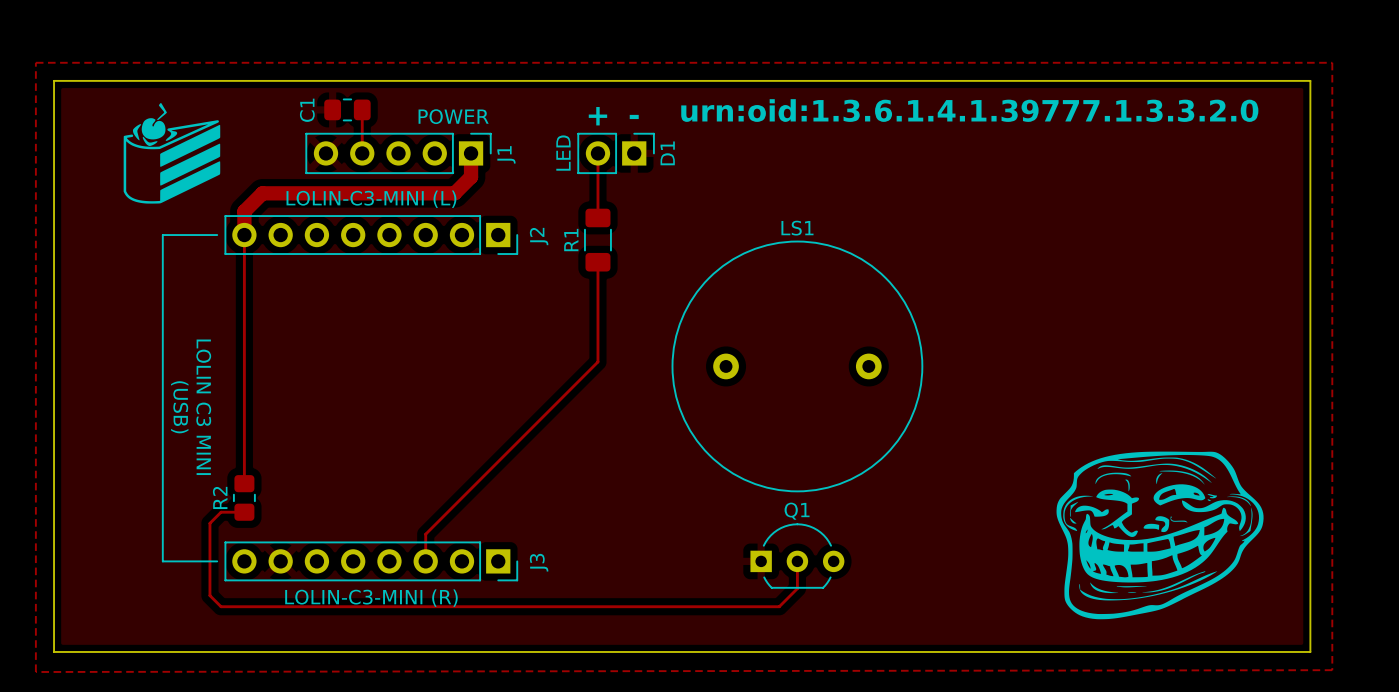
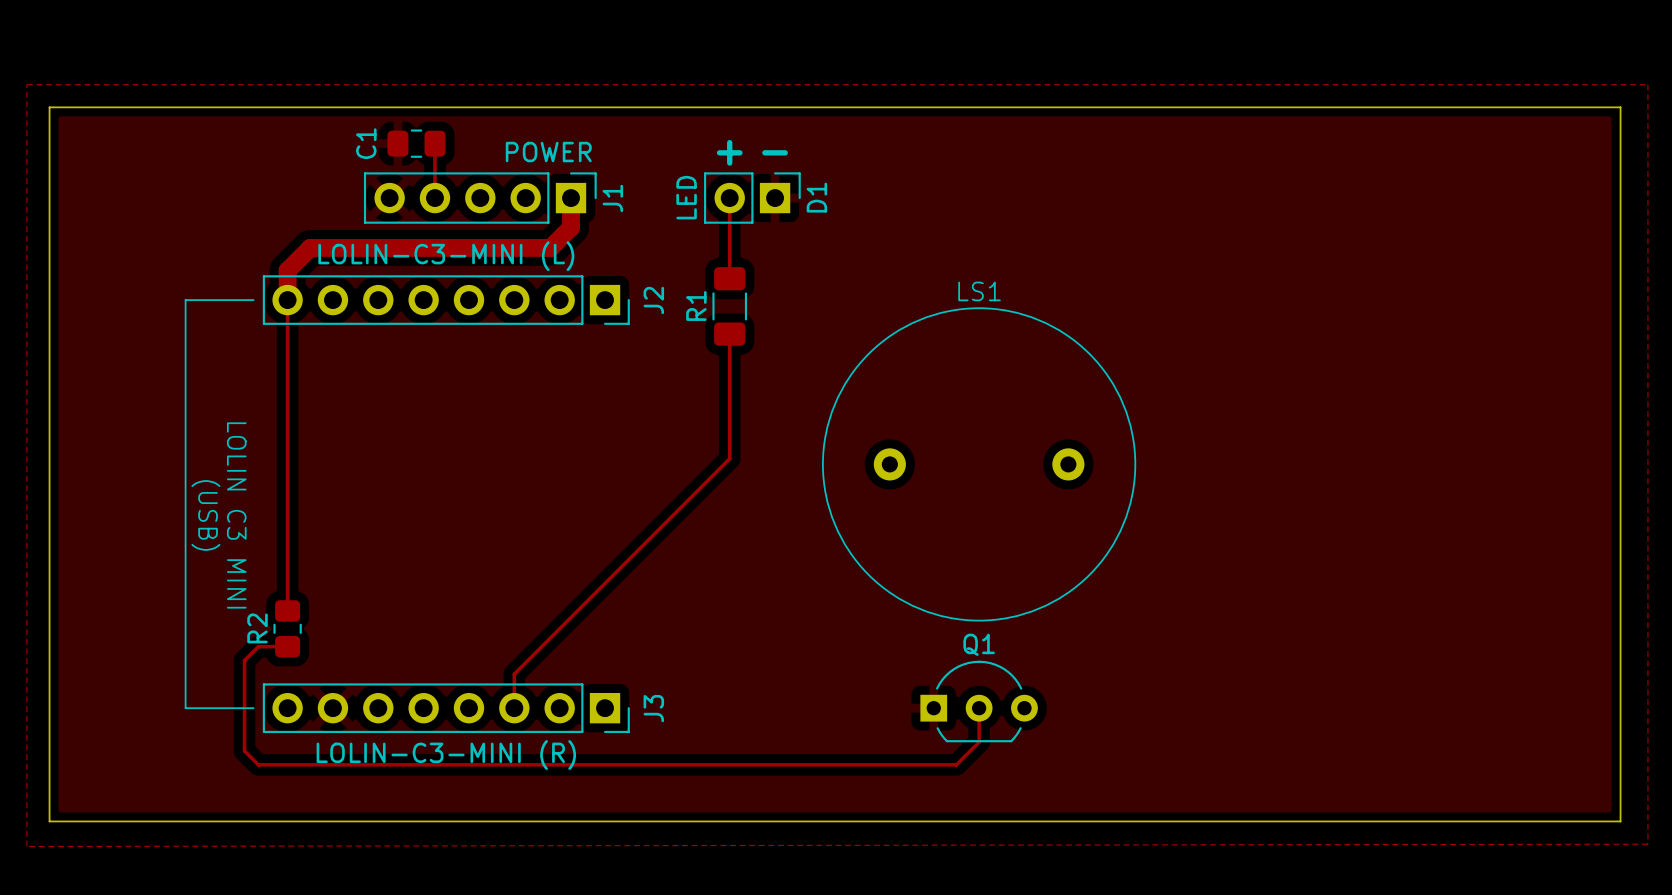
drawing: [123, 103, 221, 204] -> none
text: urn:oid:1.3.6.1.4.1.39777.1.3.3.2.0 (969, 110) -> none
drawing: [1056, 451, 1264, 620] -> none

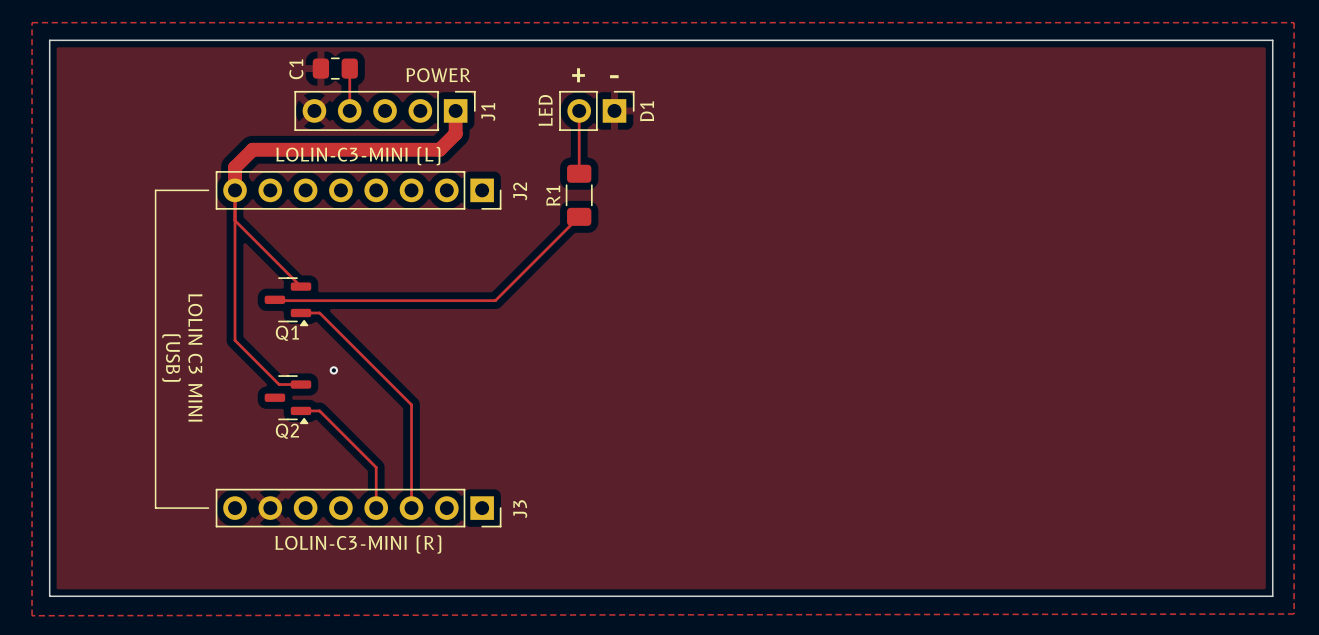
track: (729, 334) (729, 458) (514, 674) -> (579, 216) (495, 300) (275, 300)
track: none -> (235, 220) (301, 286)
track: none -> (301, 313) (319, 313) (411, 404) (411, 481)
LS1: (979, 464) -> none
track: (287, 492) (287, 610) -> (235, 340) (279, 384) (301, 384)
via: none -> (333, 370)
Q2: none -> (287, 399)
track: none -> (301, 410) (319, 410) (376, 467) (376, 508)
R2: (287, 628) -> none
Q1 name position: Q1 (979, 644) -> Q1 (287, 333)
track: (287, 646) (258, 646) (244, 660) (244, 750) (258, 764) (956, 764) (979, 742) (979, 708) -> none
Q1 footprint: [920, 660, 1038, 743] -> [264, 277, 312, 327]

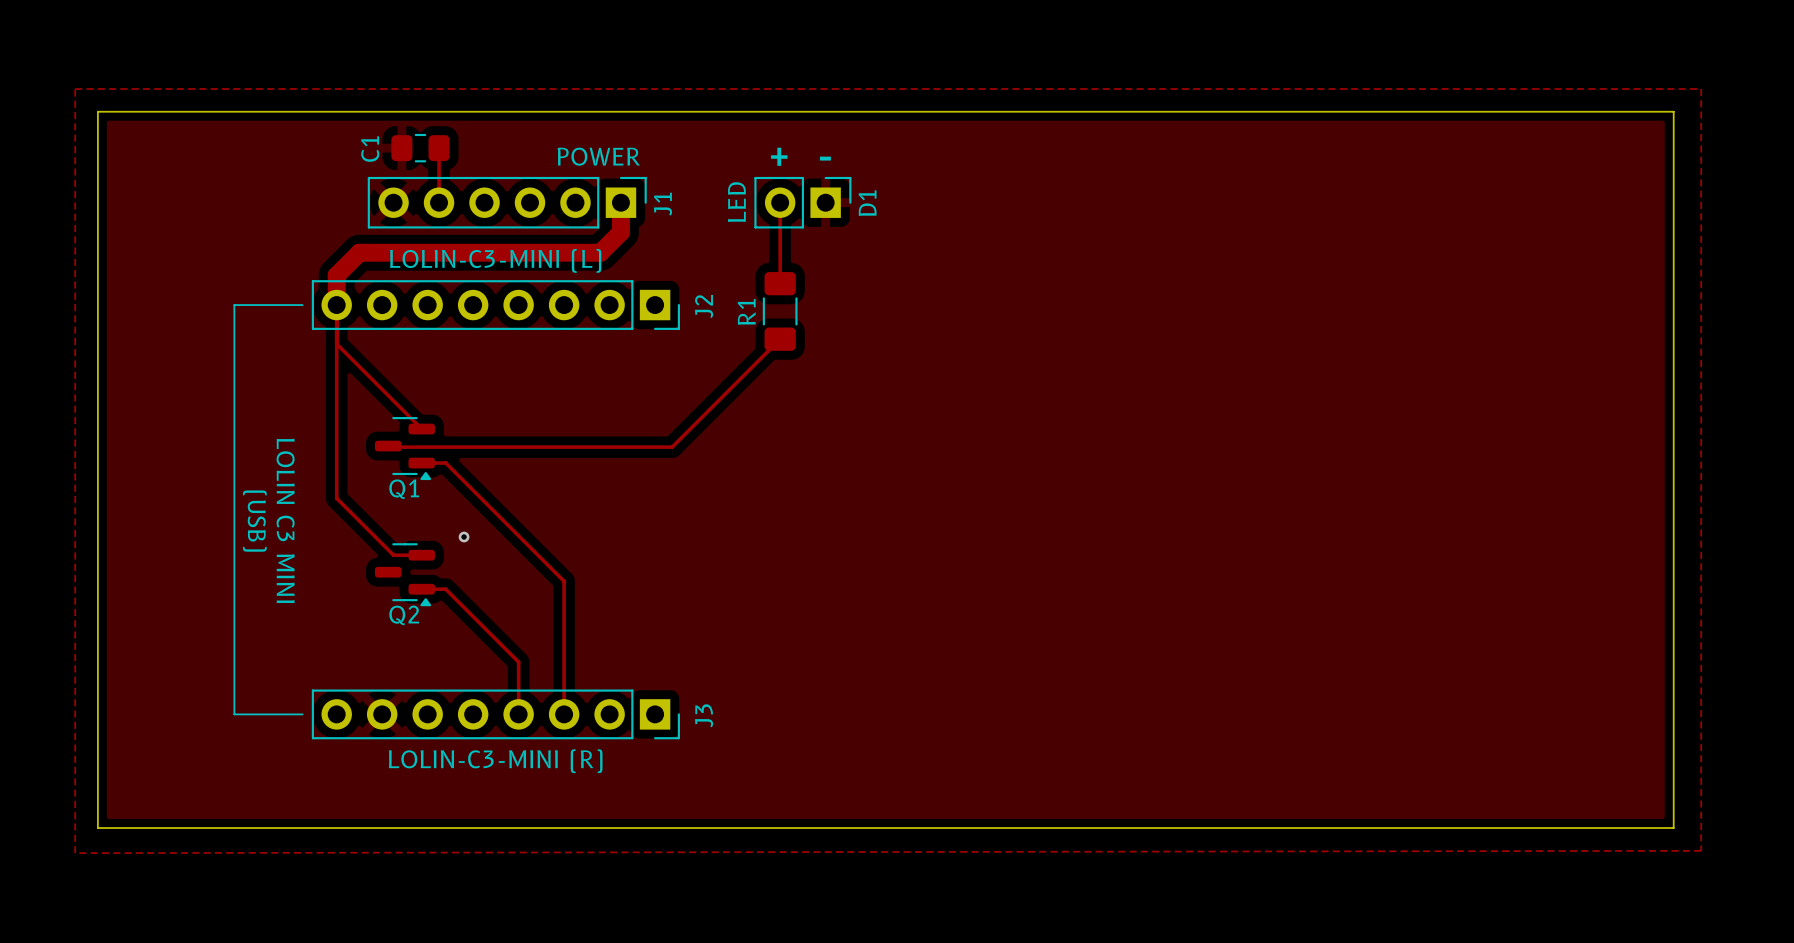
C1 position: (335, 68) -> (420, 148)
track: (349, 68) (349, 110) -> (439, 148) (439, 202)
J1 footprint: [294, 90, 476, 131] -> [367, 176, 647, 229]

